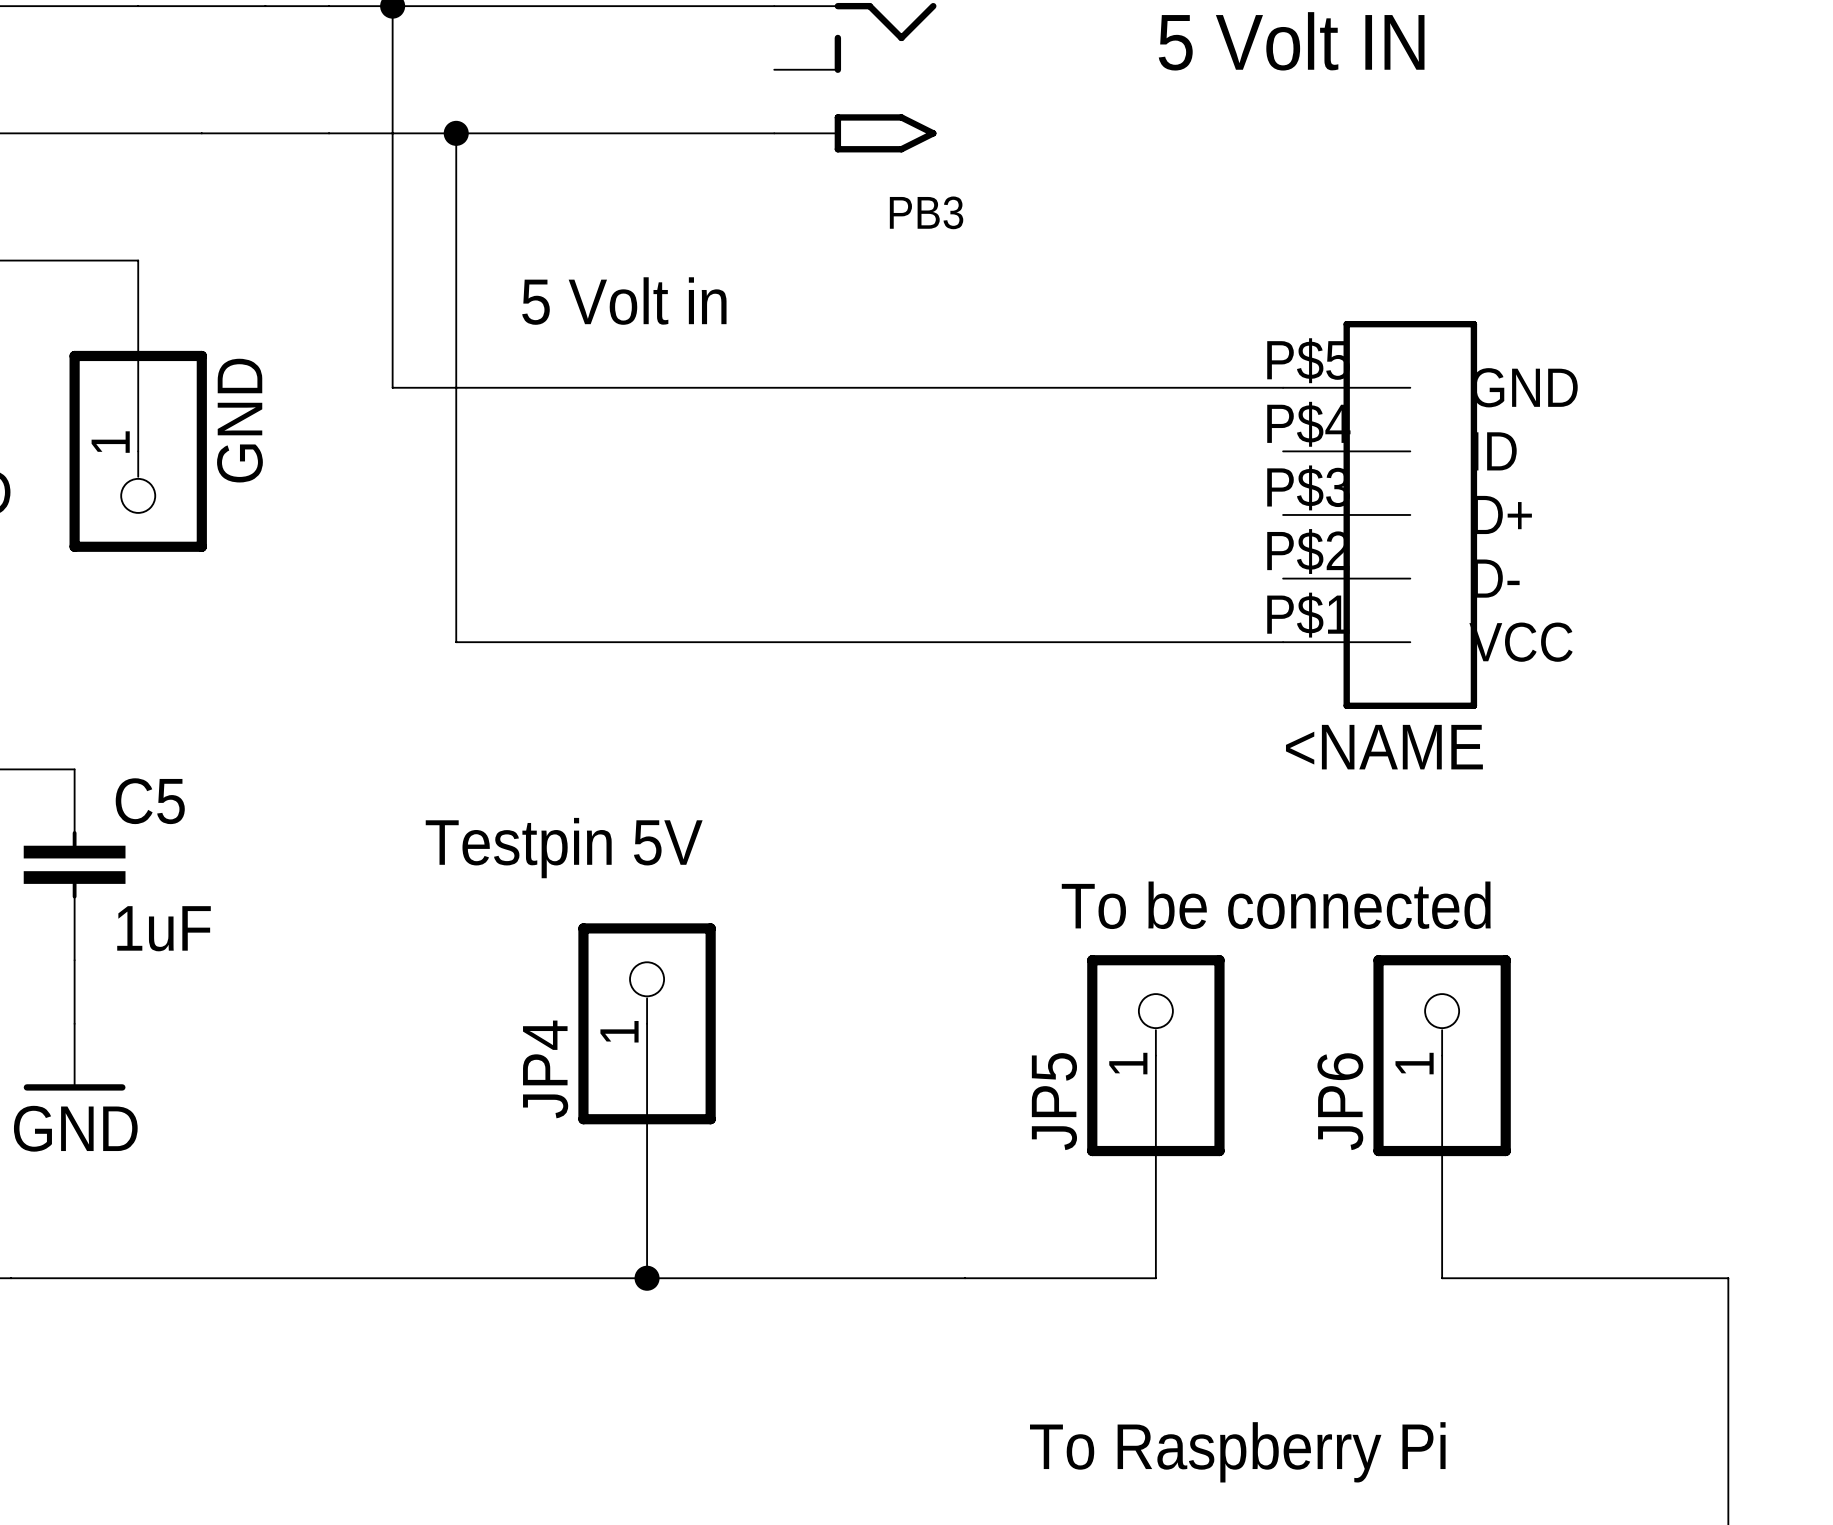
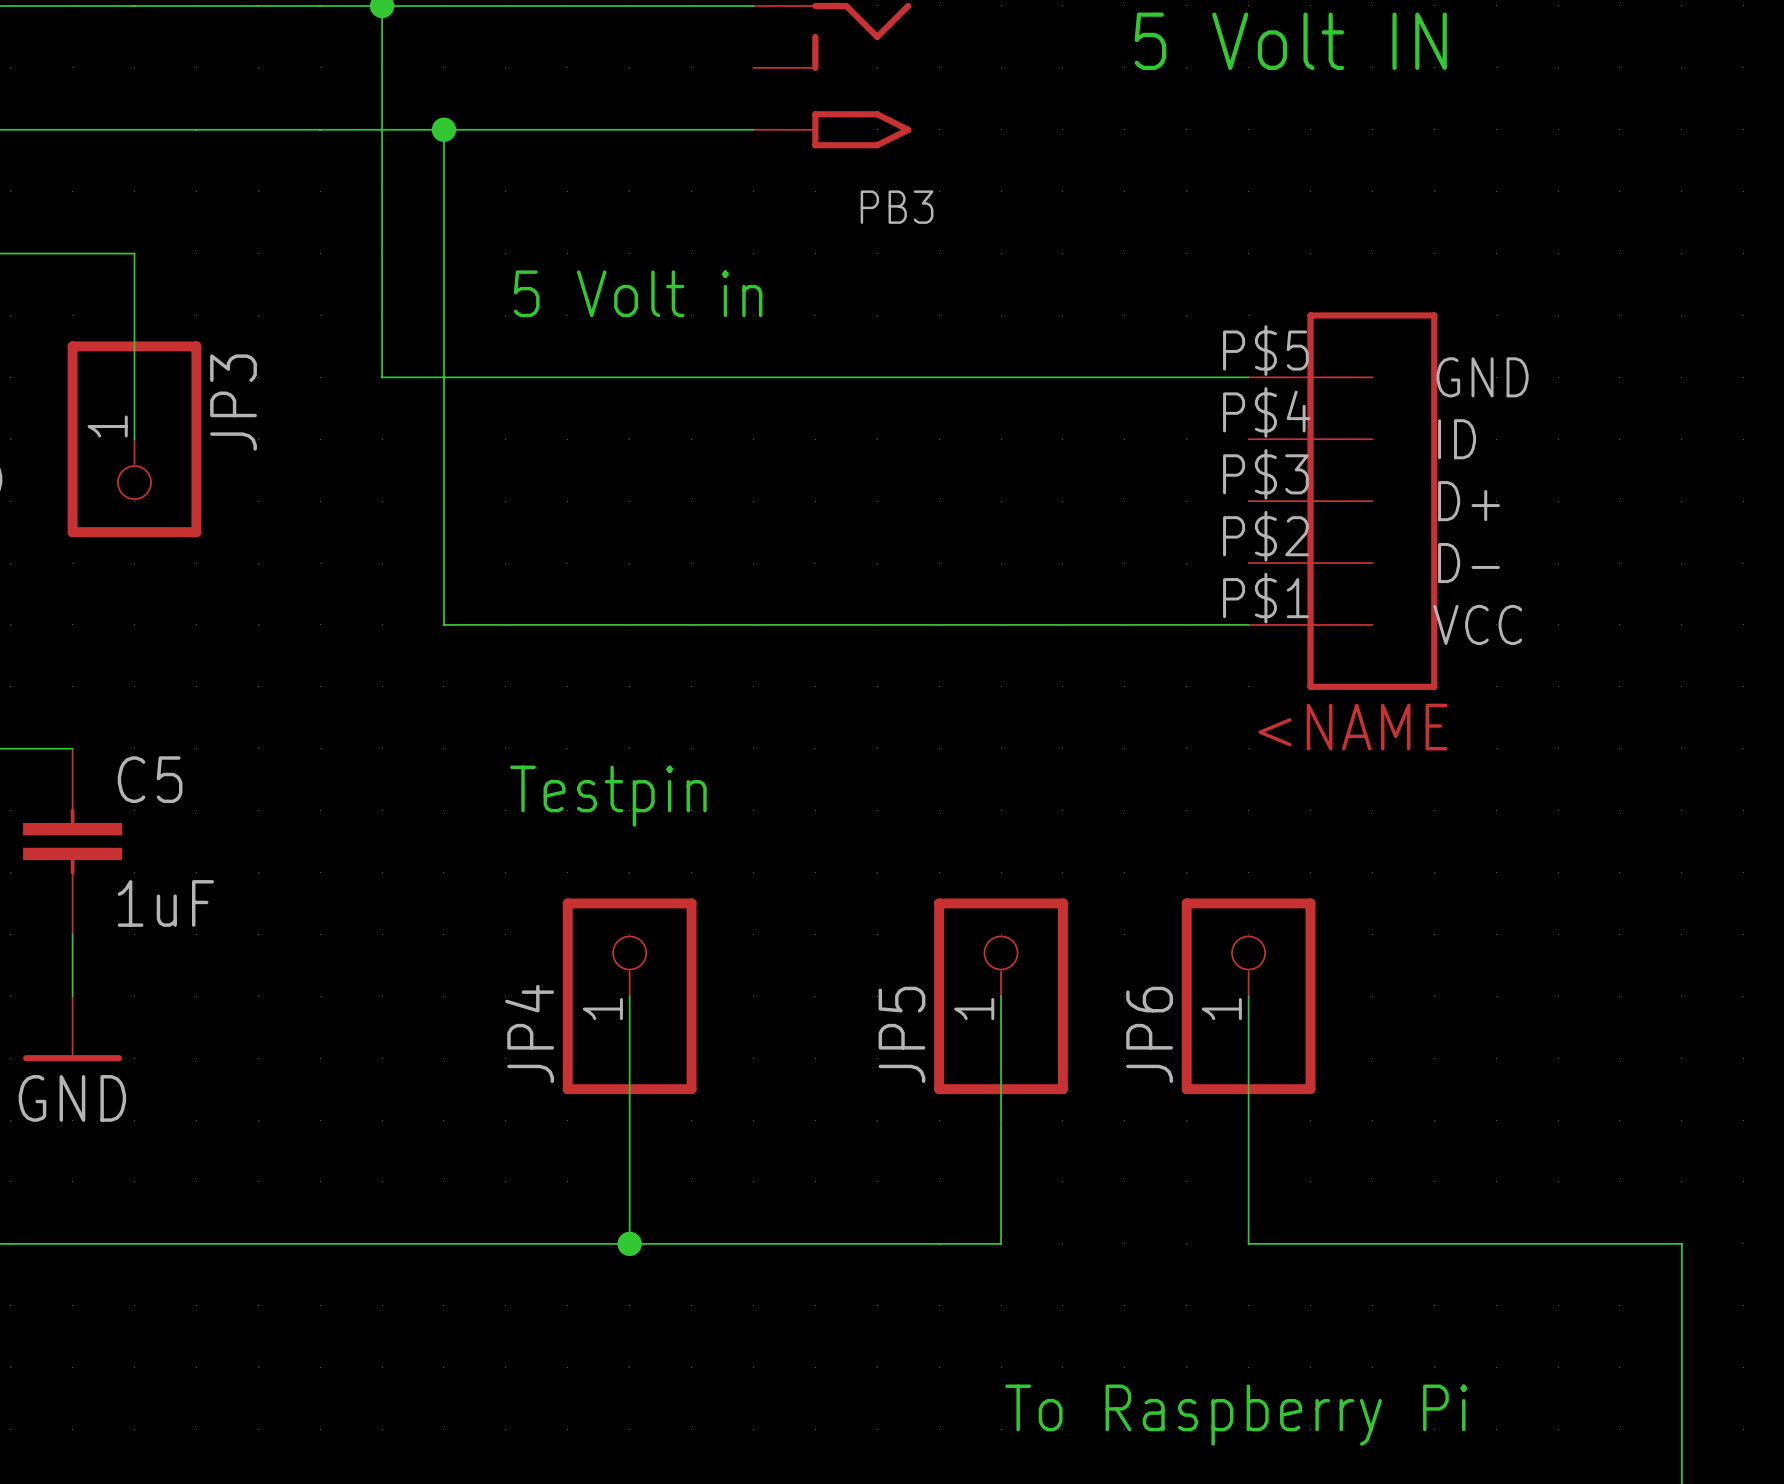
GND name: GND (239, 420) -> JP3 (233, 402)
text: Testpin 5V (564, 848) -> Testpin (608, 796)
text: To be connected (1276, 905) -> none
wire: (1155, 1055) (1155, 1278) (1028, 1278) -> (1001, 996) (1001, 1243)
JP5 position: (1155, 1055) -> (1001, 996)
wire: (1442, 1055) (1442, 1278) -> (1248, 996) (1248, 1243) (1403, 1243)
JP6 position: (1442, 1055) -> (1248, 996)

